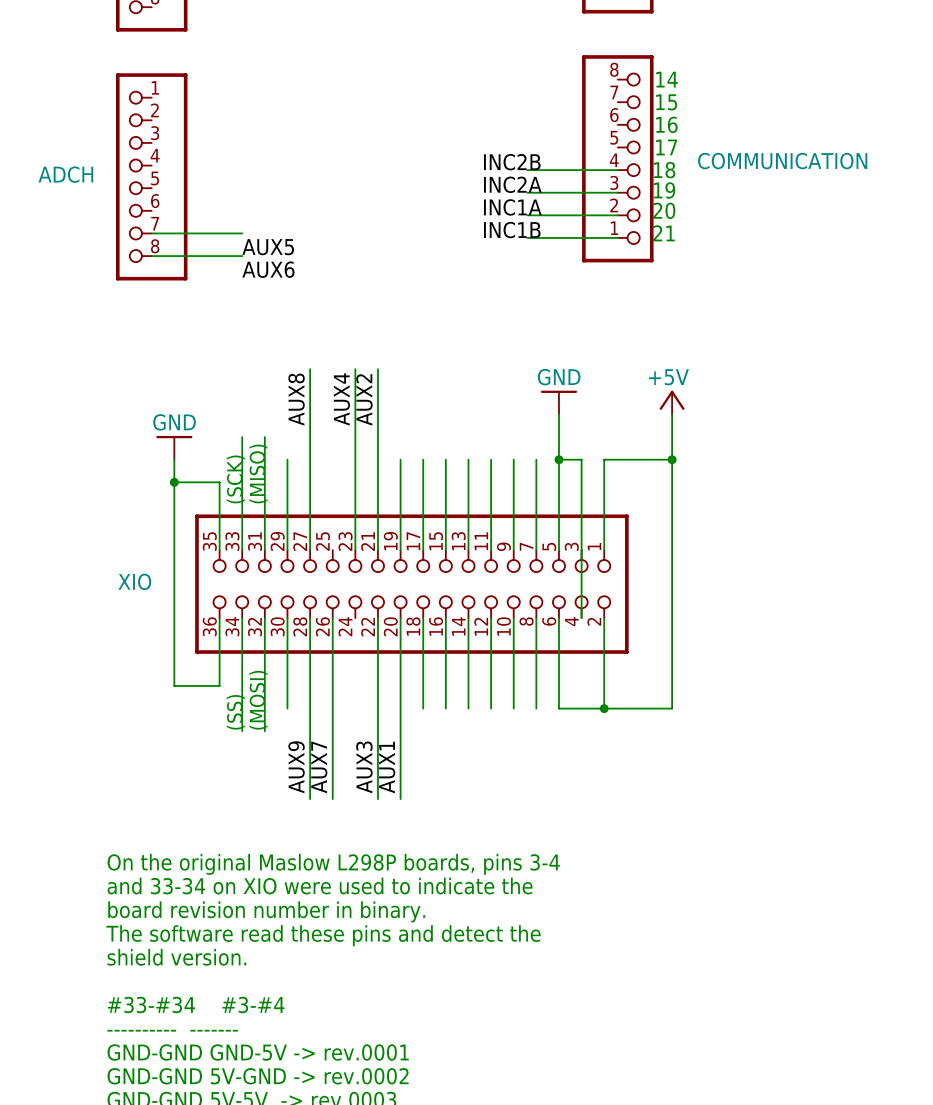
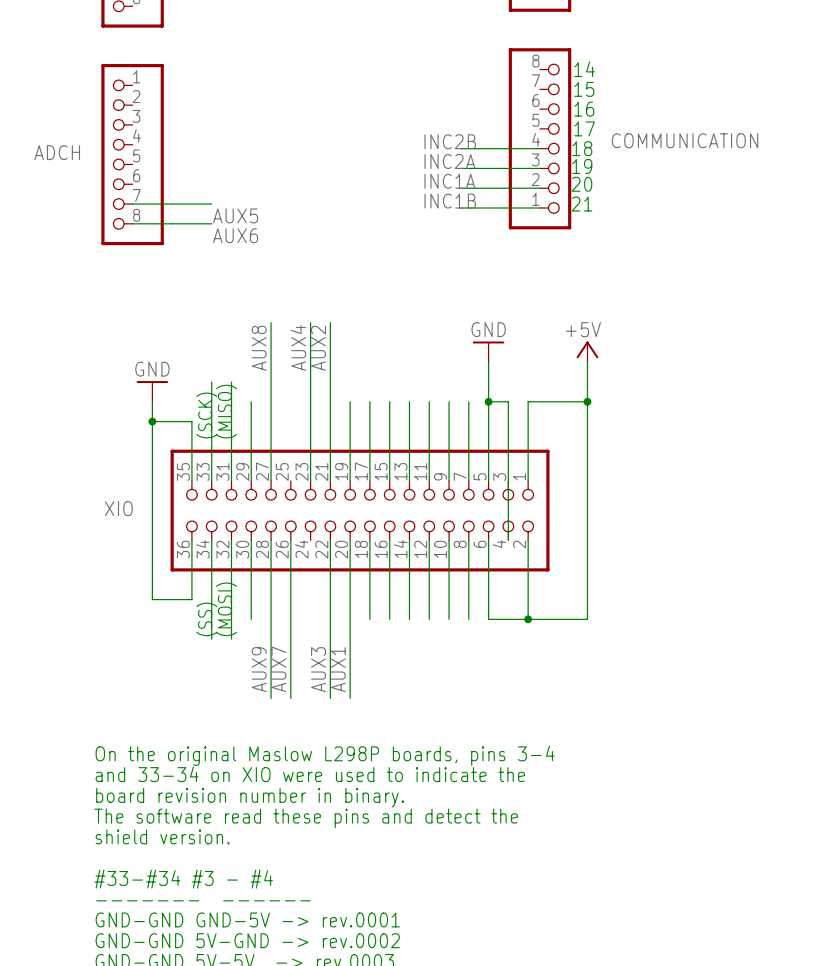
text: #33-#34 #3-#4 (196, 1004) -> #33-#34 #3 - #4 (183, 879)
text: ---------- ------- (172, 1030) -> ------- ------ (203, 900)

